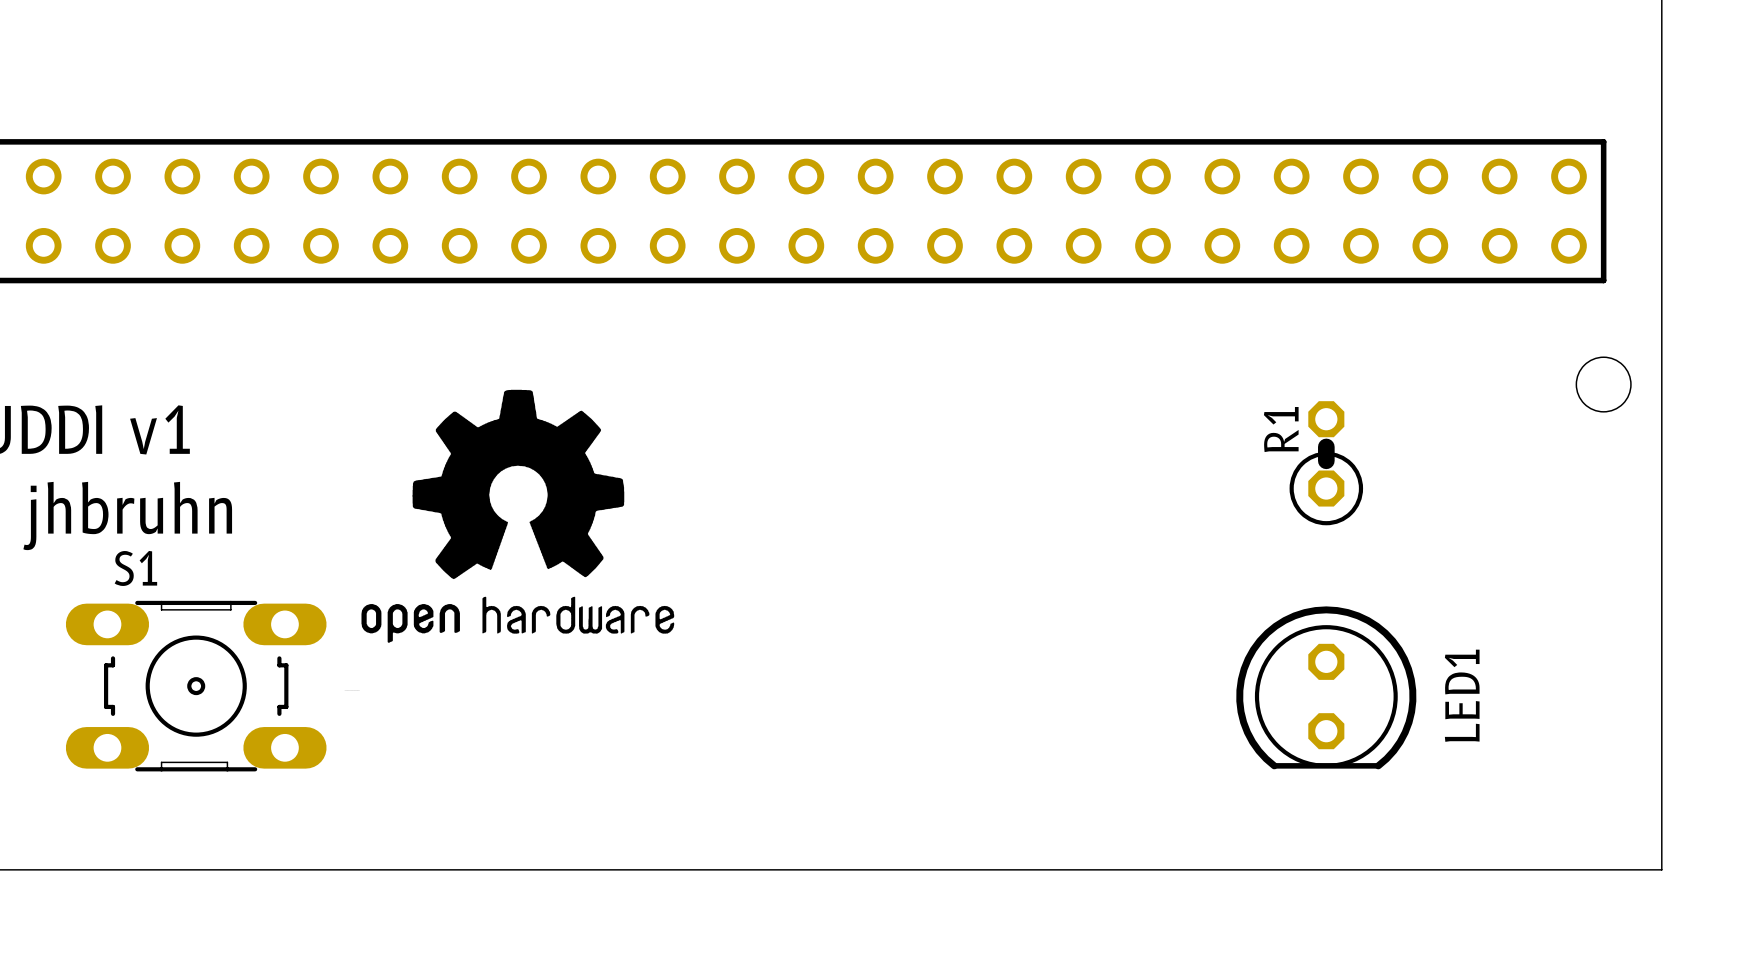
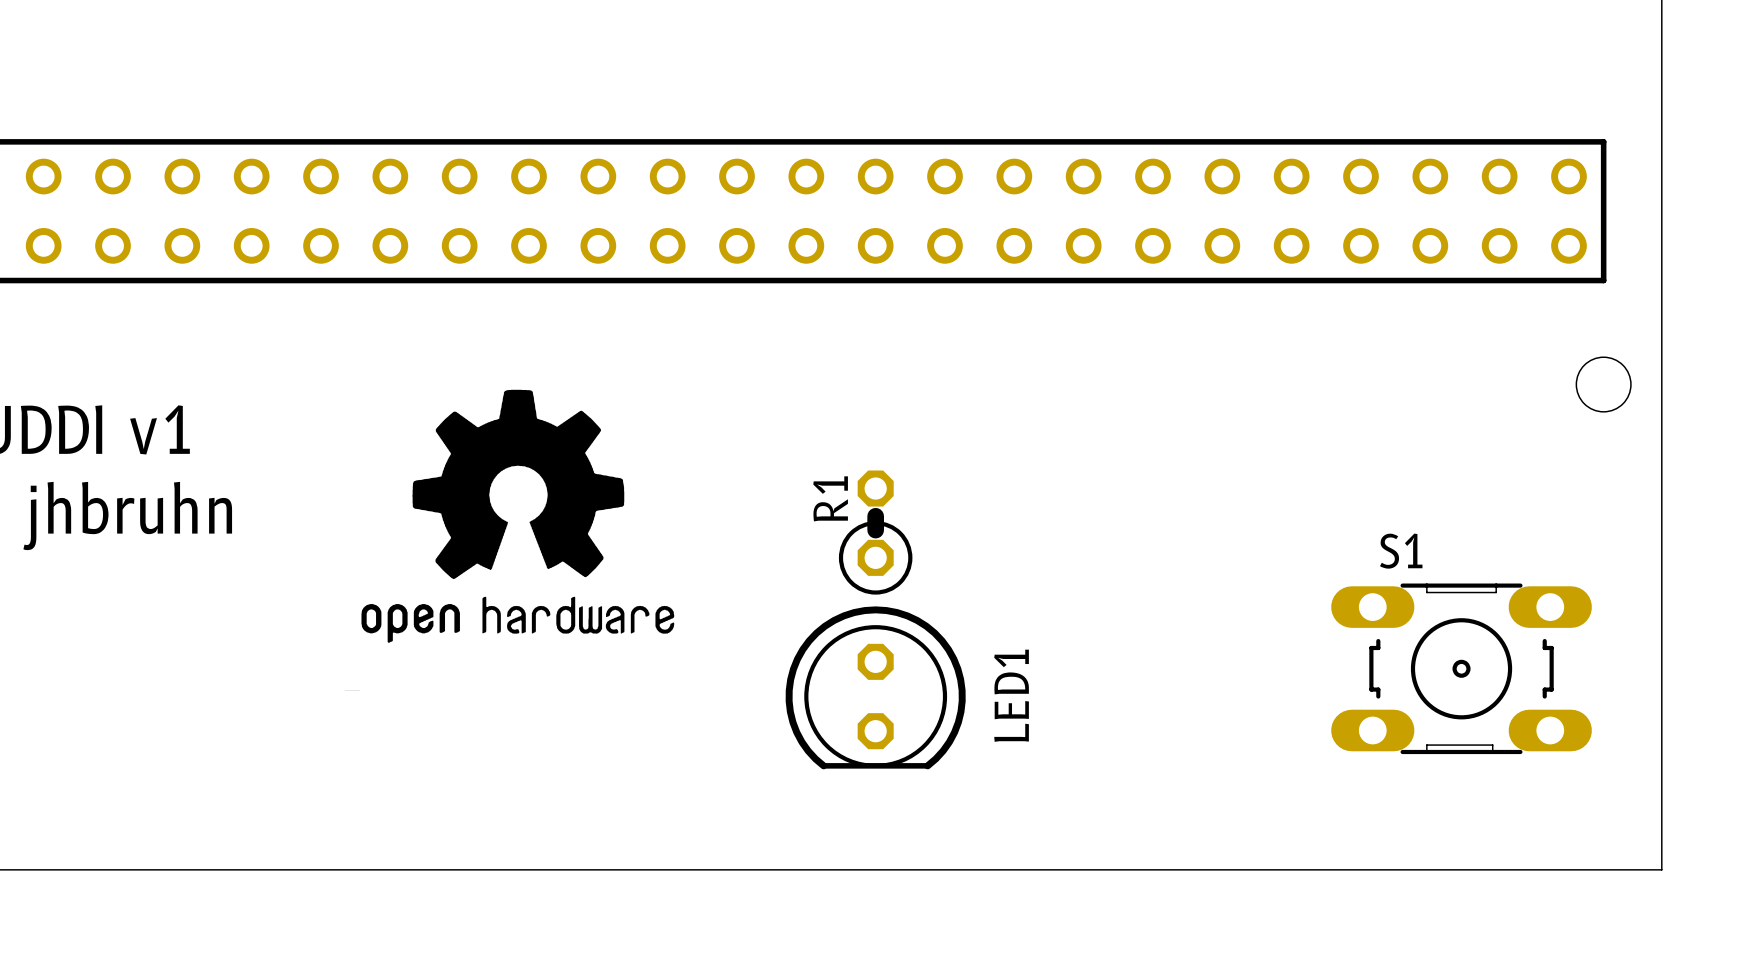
R1 position: (1326, 463) -> (875, 532)
S1 position: (196, 686) -> (1461, 668)
LED1 position: (1326, 687) -> (875, 687)

